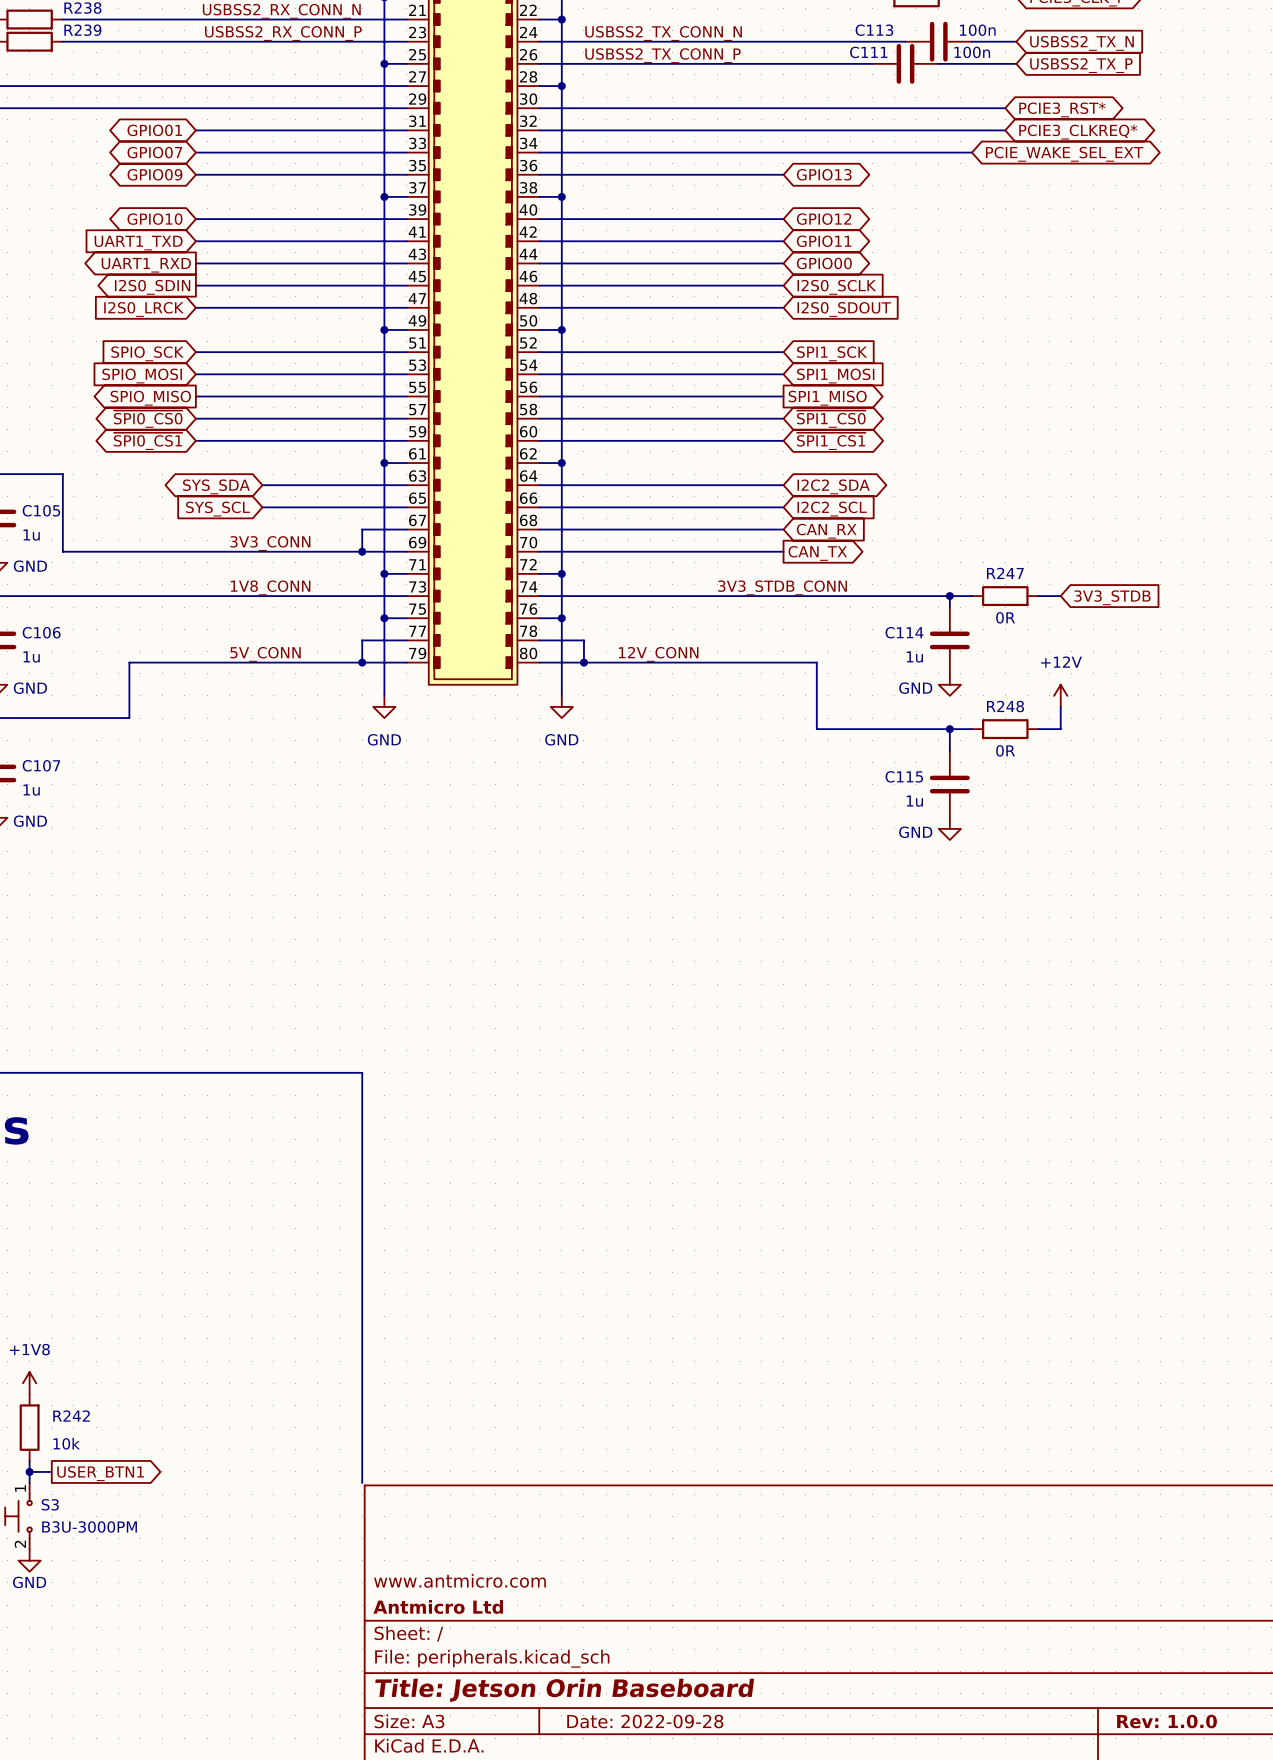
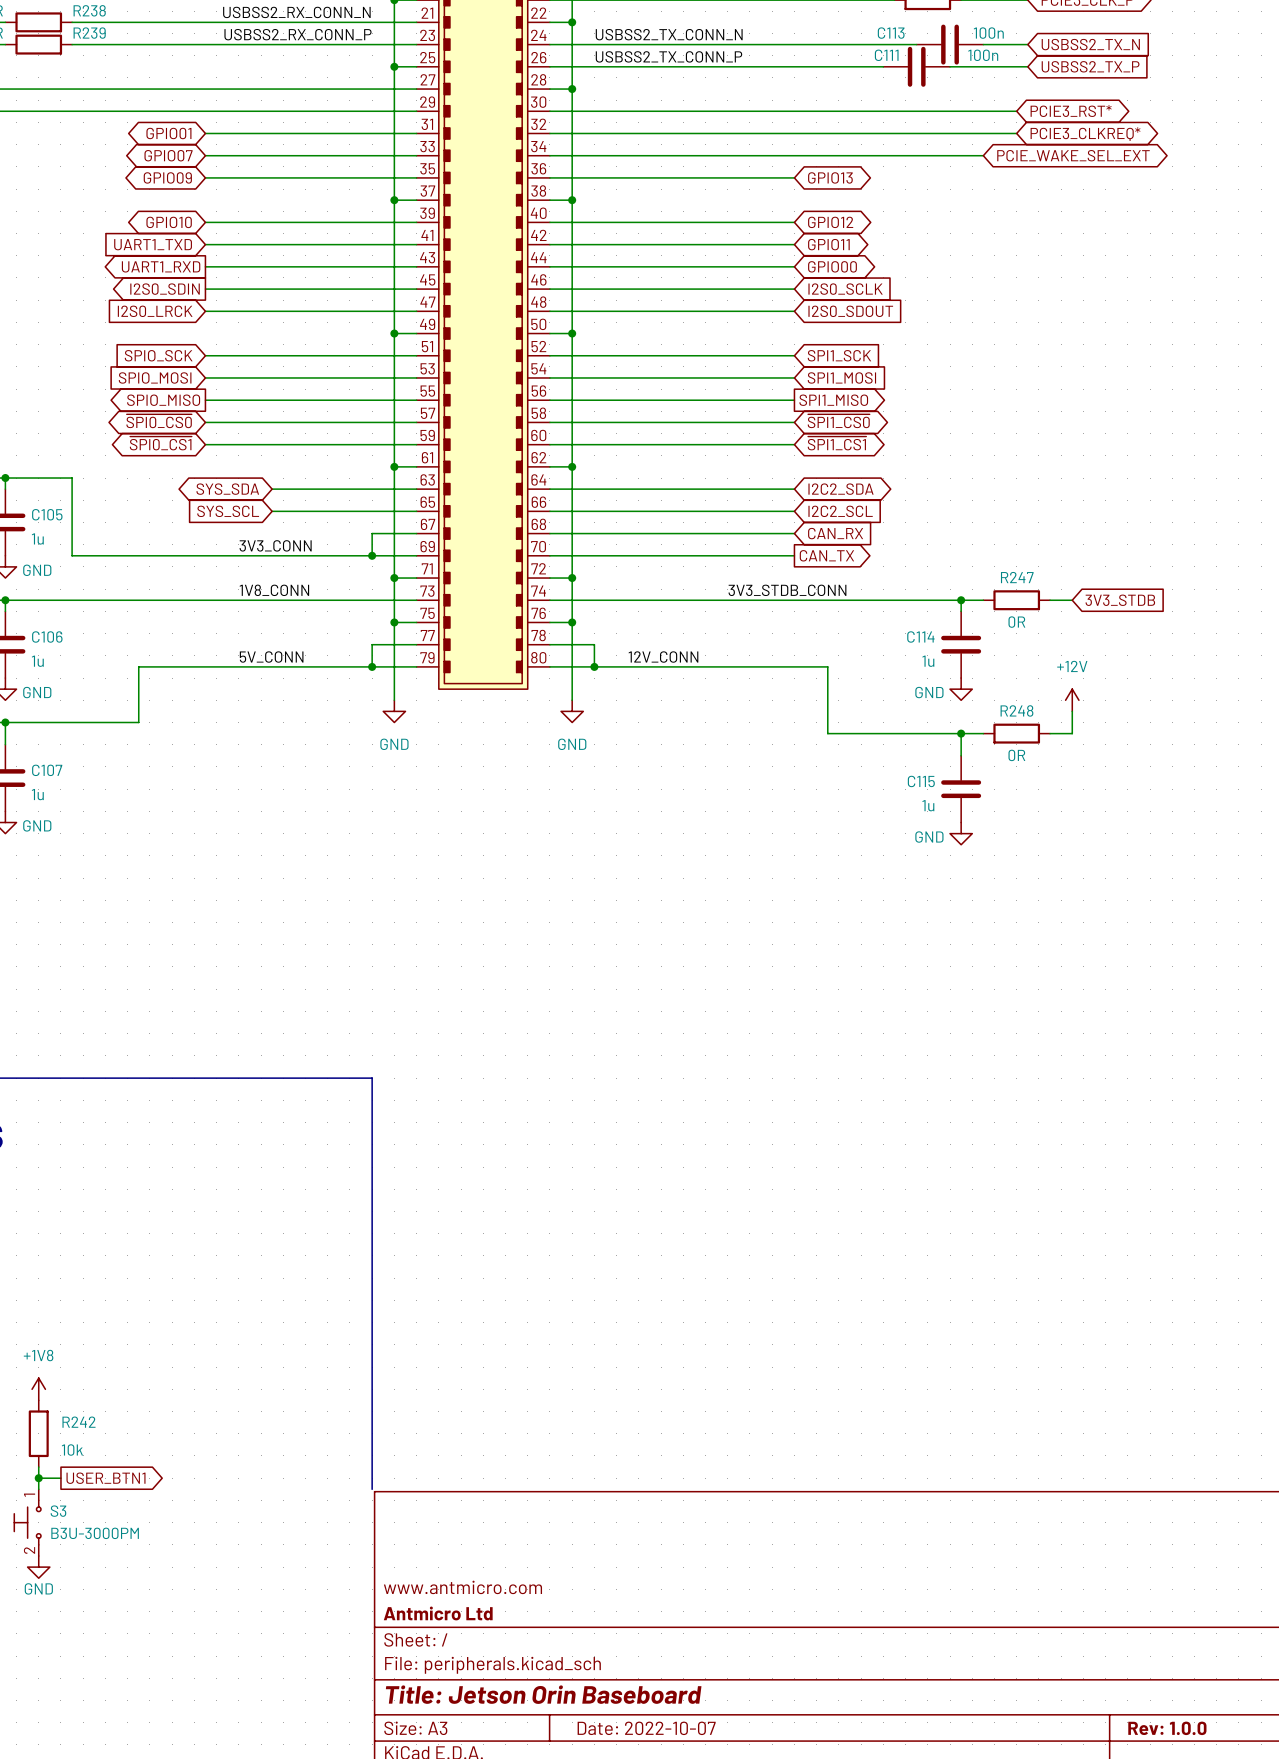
title block: Date: 2022-09-28 (645, 1721) -> Date: 2022-10-07 (646, 1728)

